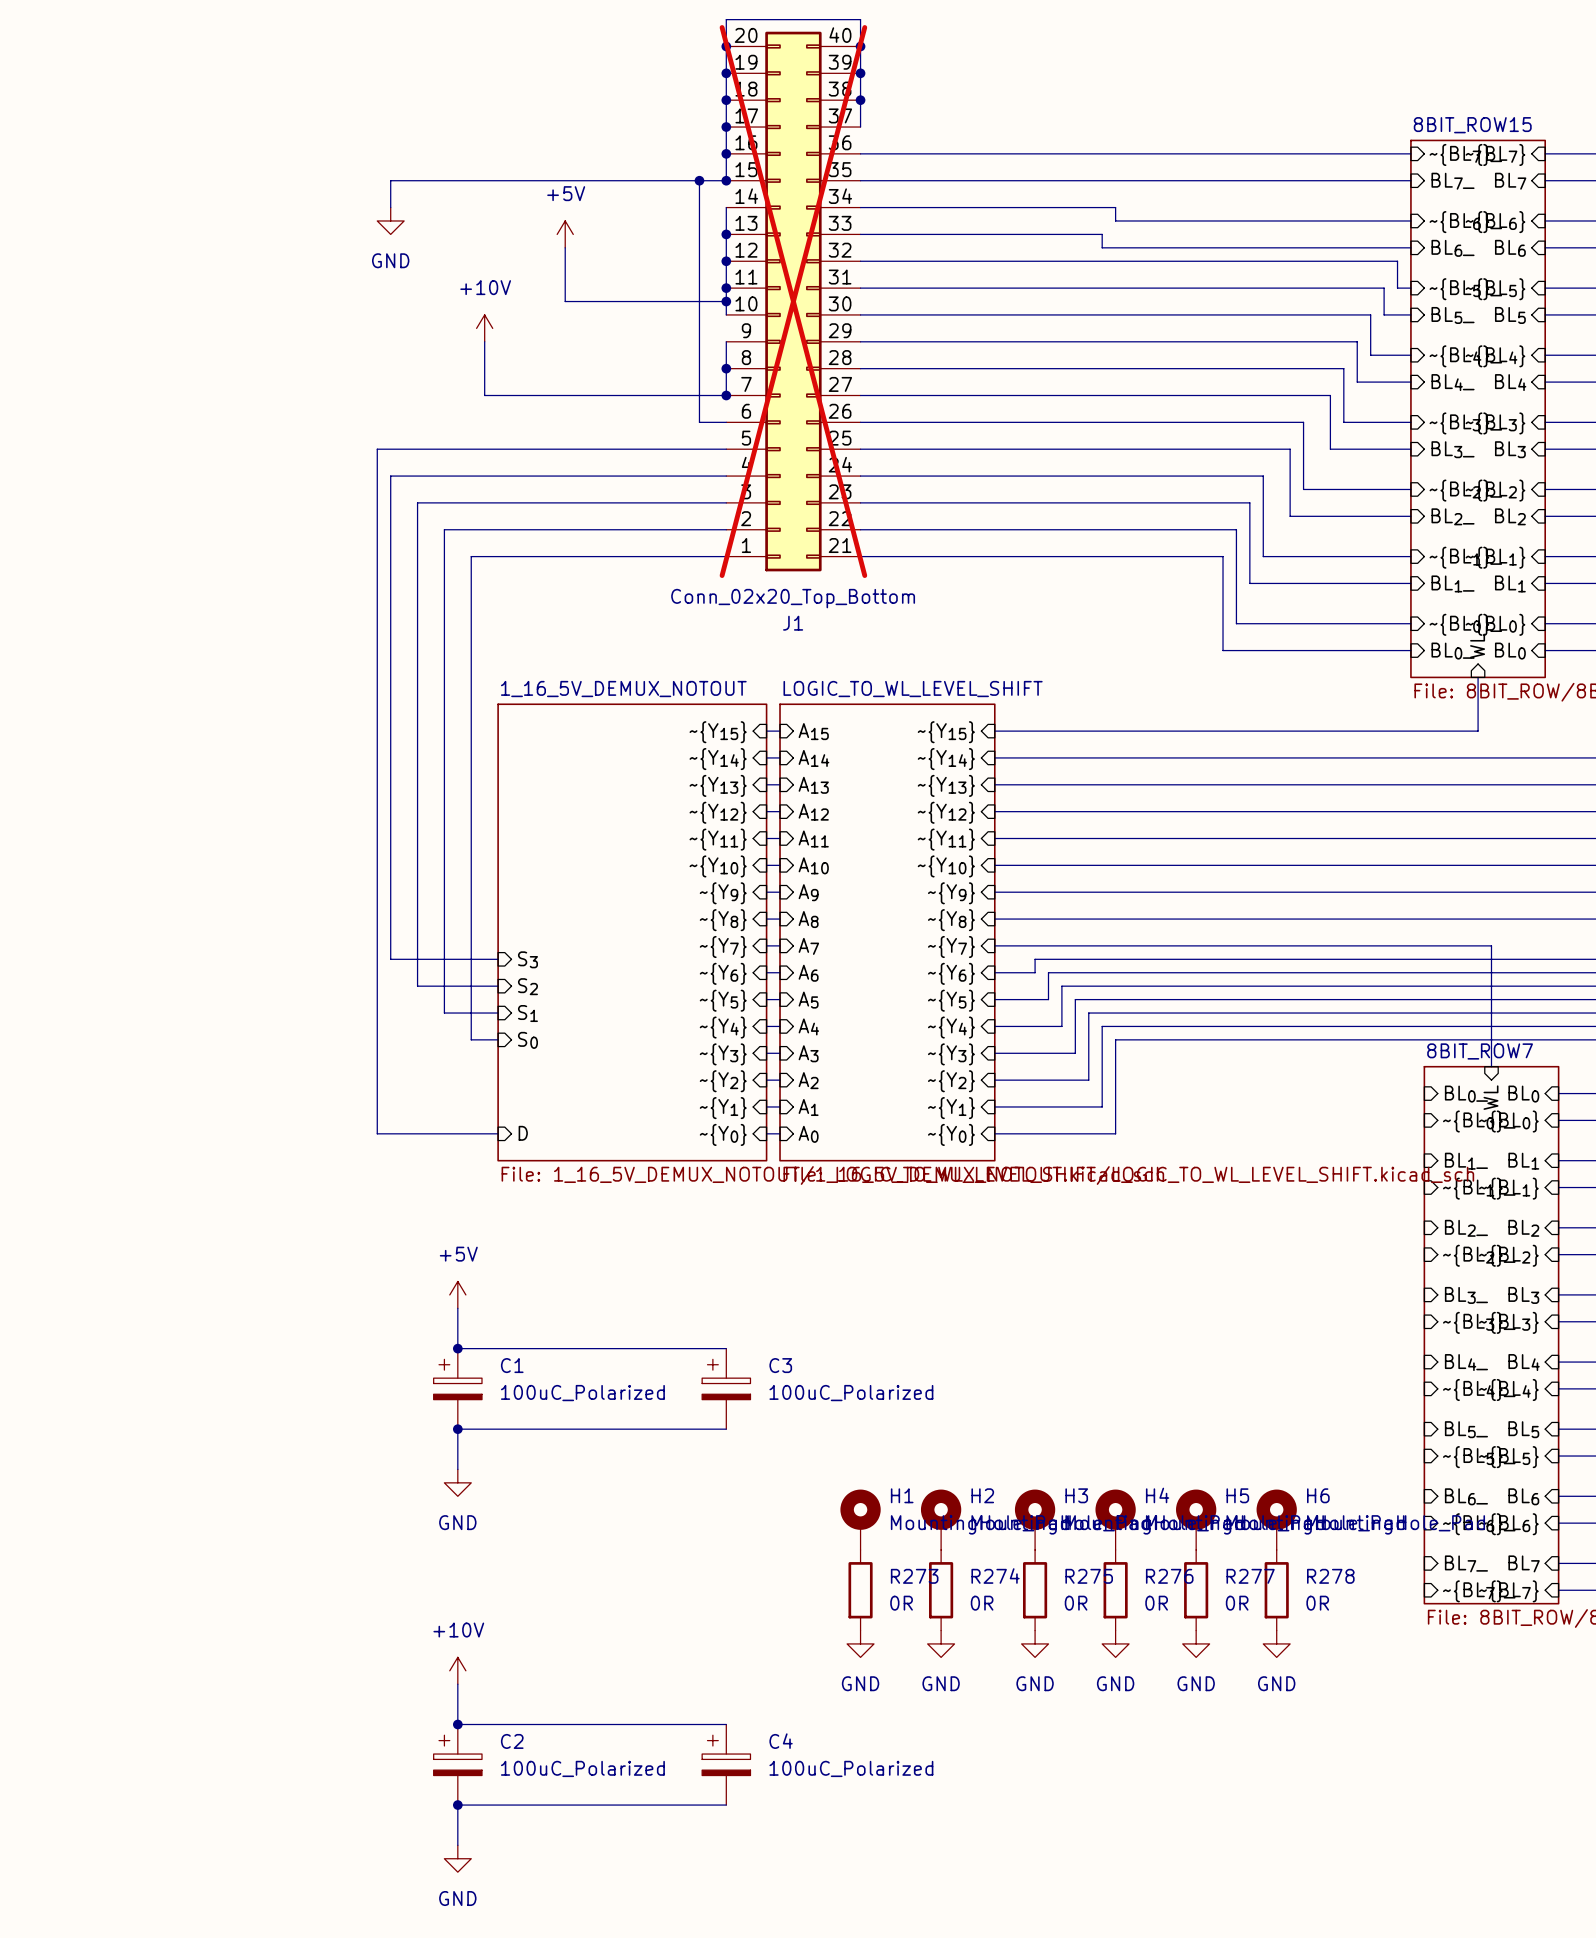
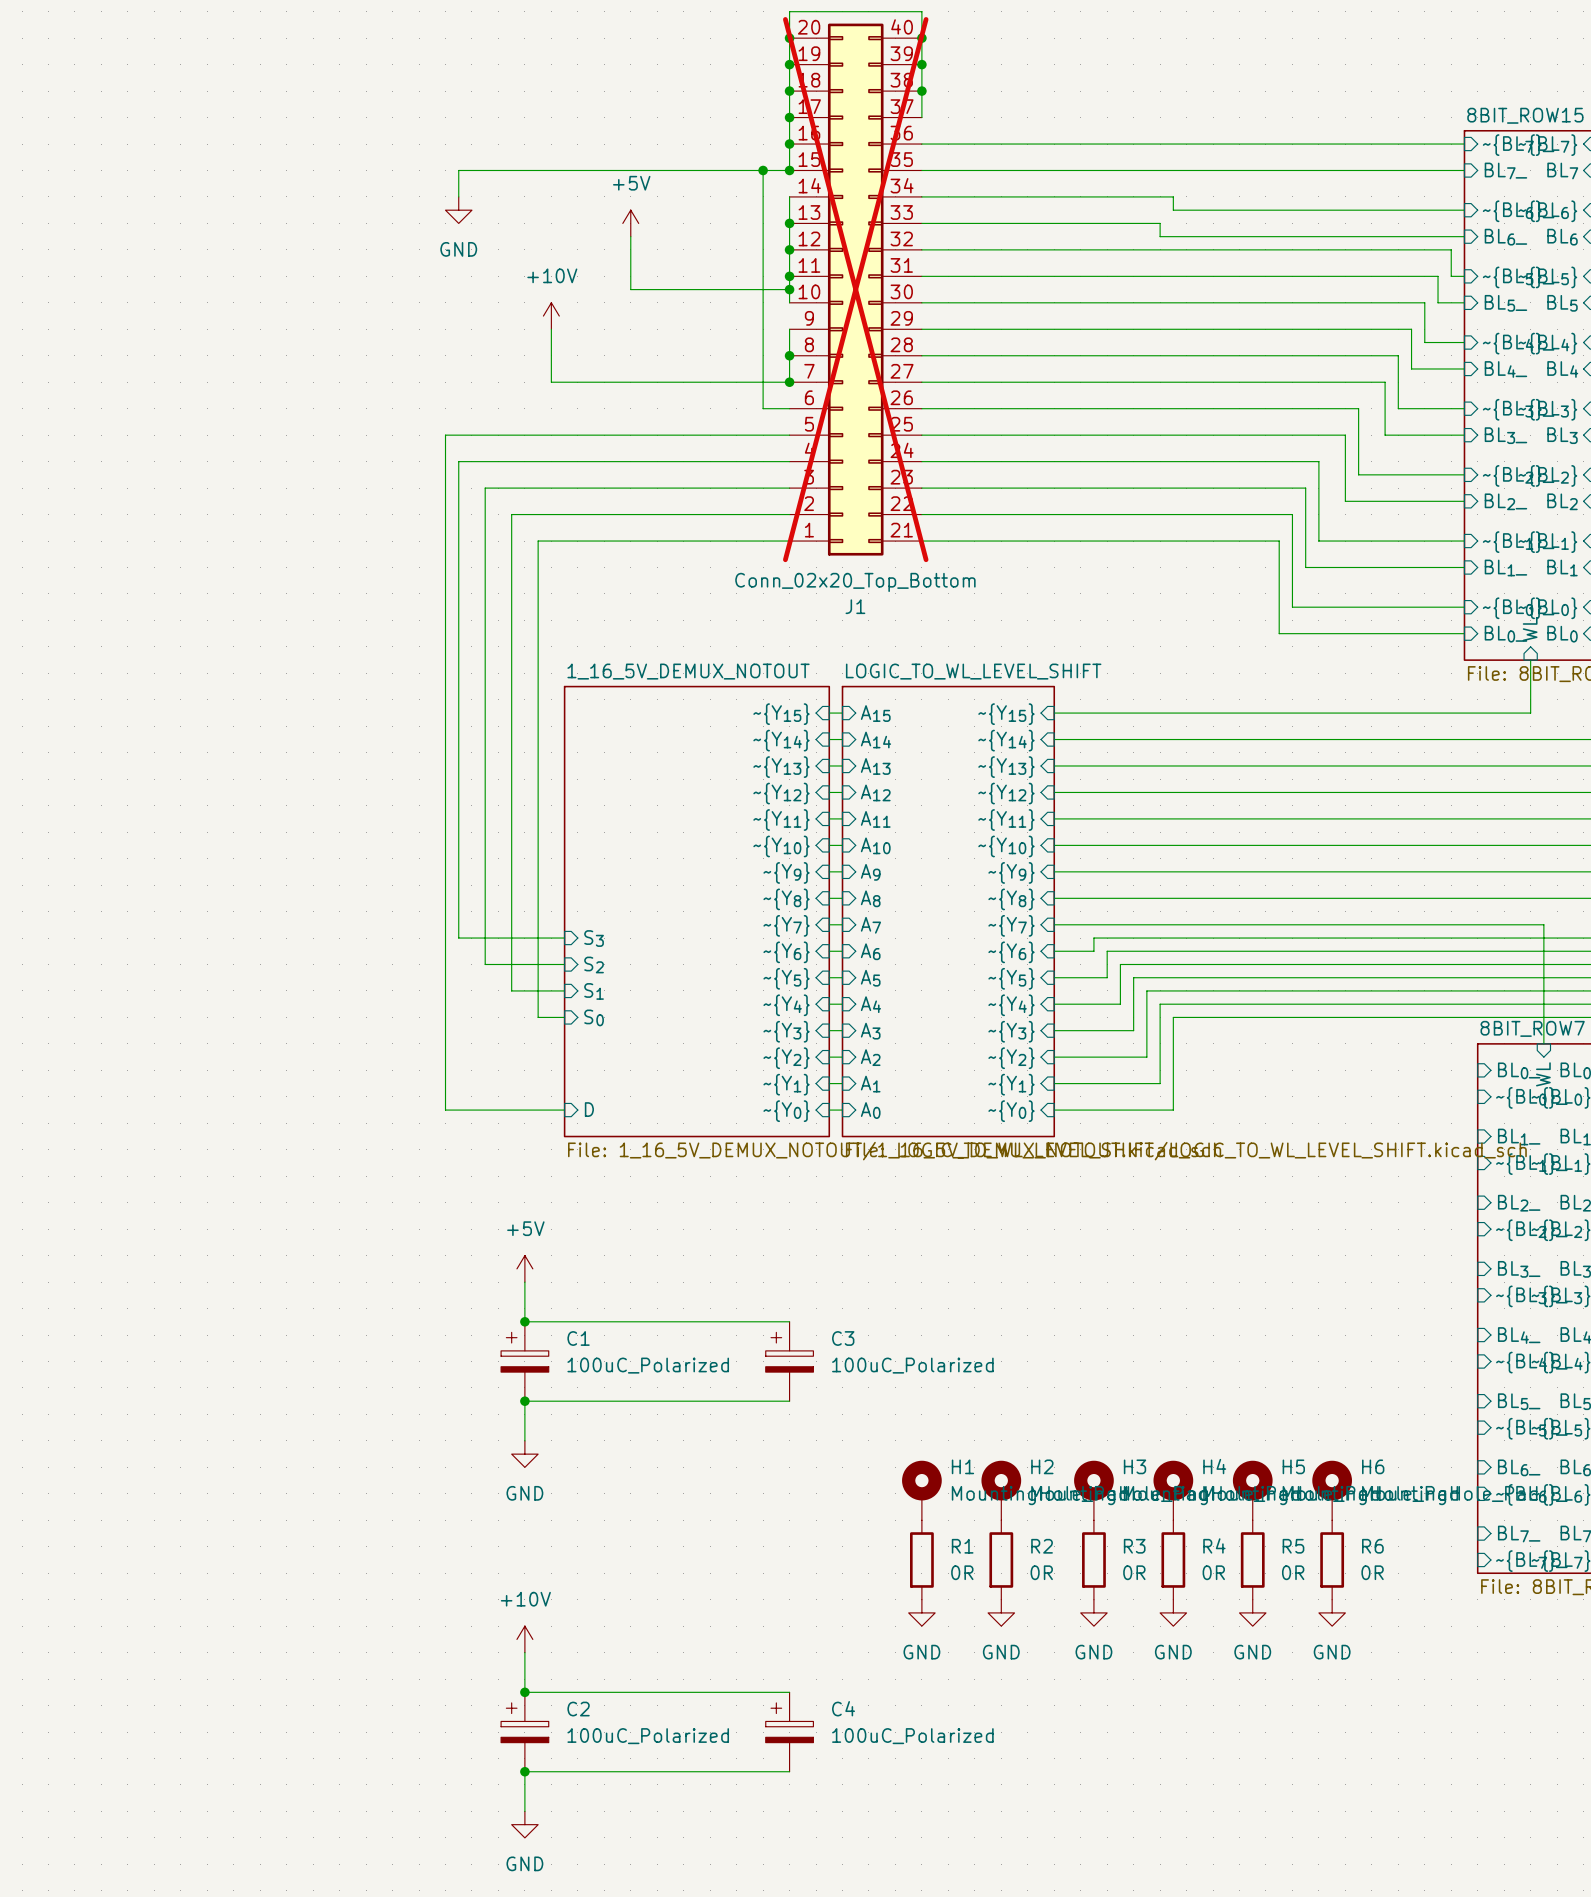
R273 name: R273 (914, 1576) -> R1 (962, 1546)
R274 name: R274 (995, 1576) -> R2 (1042, 1546)
R275 name: R275 (1089, 1576) -> R3 (1134, 1546)
R276 name: R276 (1169, 1576) -> R4 (1214, 1545)
R277 name: R277 (1250, 1576) -> R5 (1293, 1546)
R278 name: R278 (1330, 1576) -> R6 (1372, 1546)

